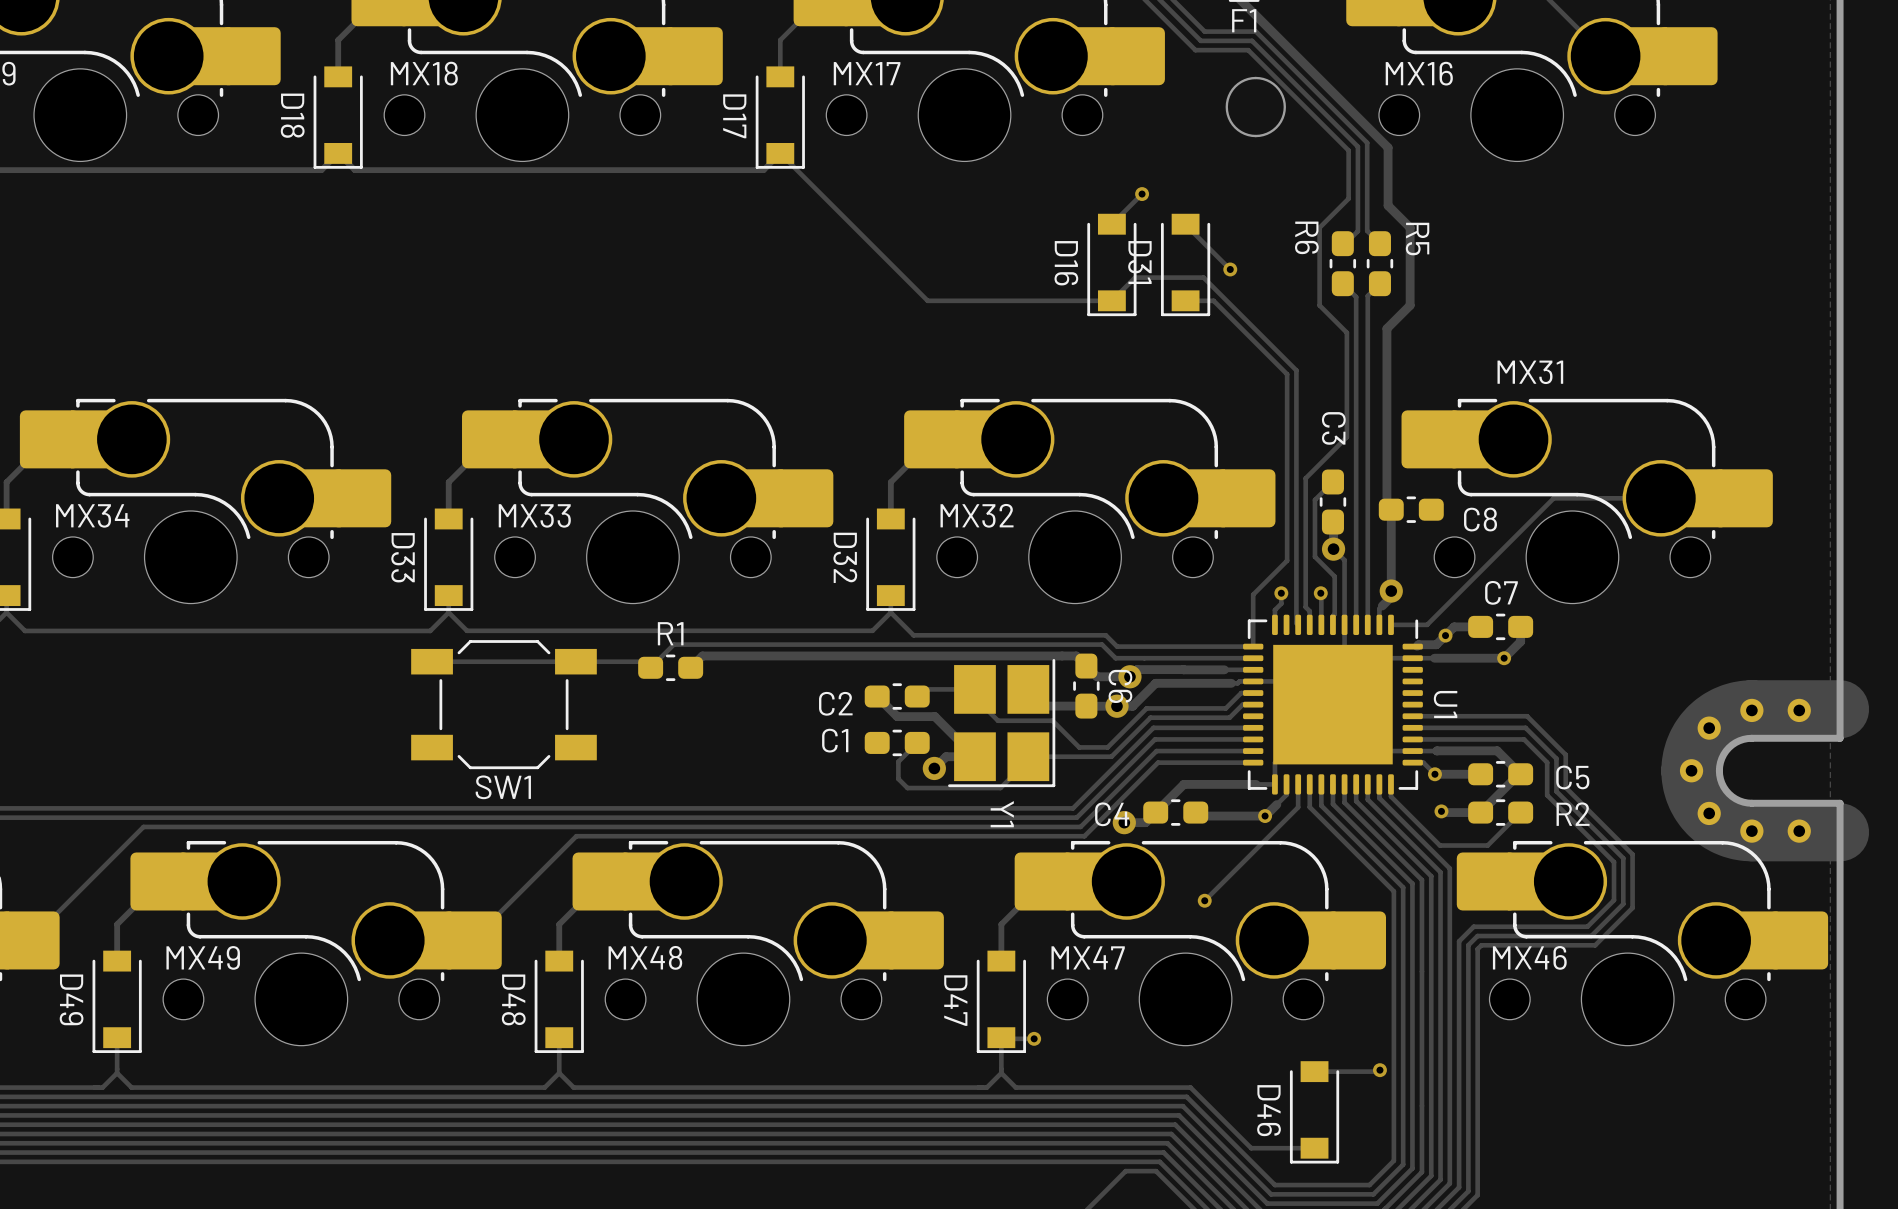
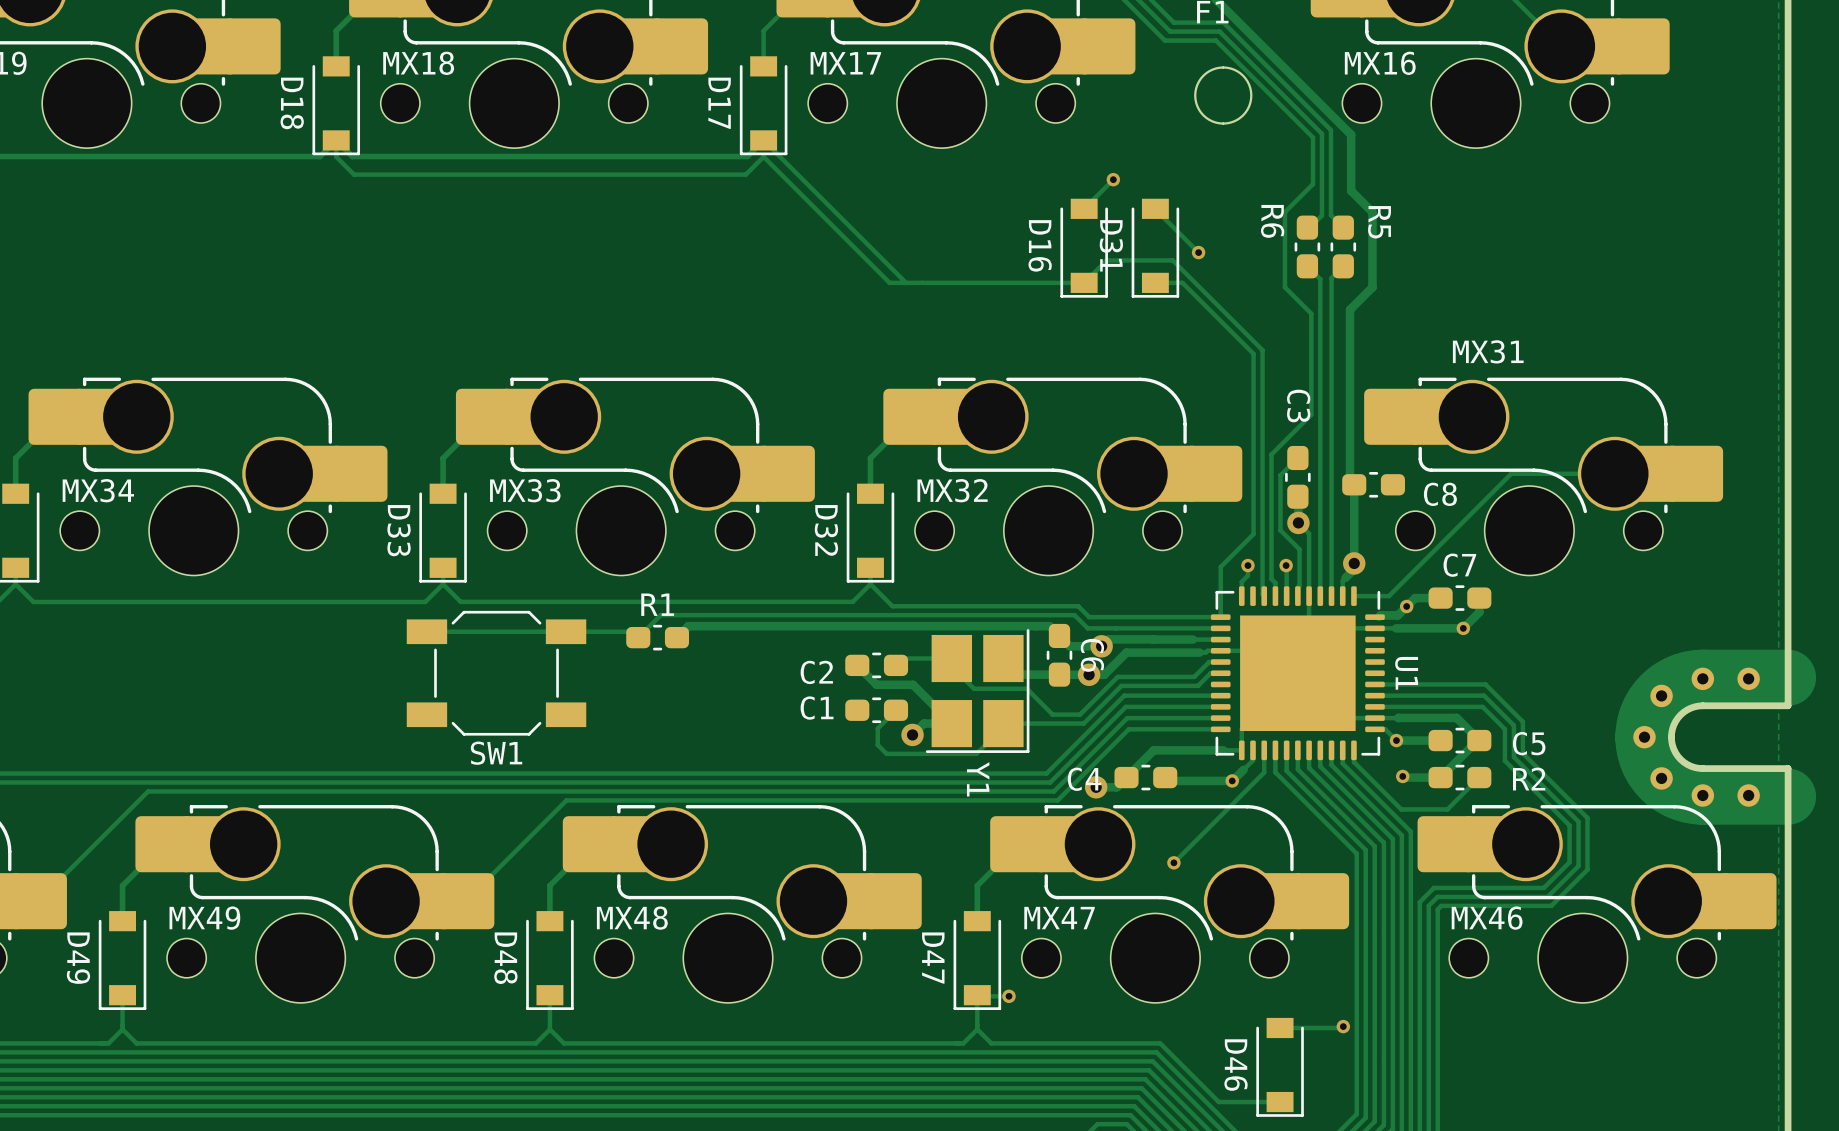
track: none -> (336, 140) (336, 156) (354, 174) (745, 174) (763, 156) (889, 282) (906, 282)

